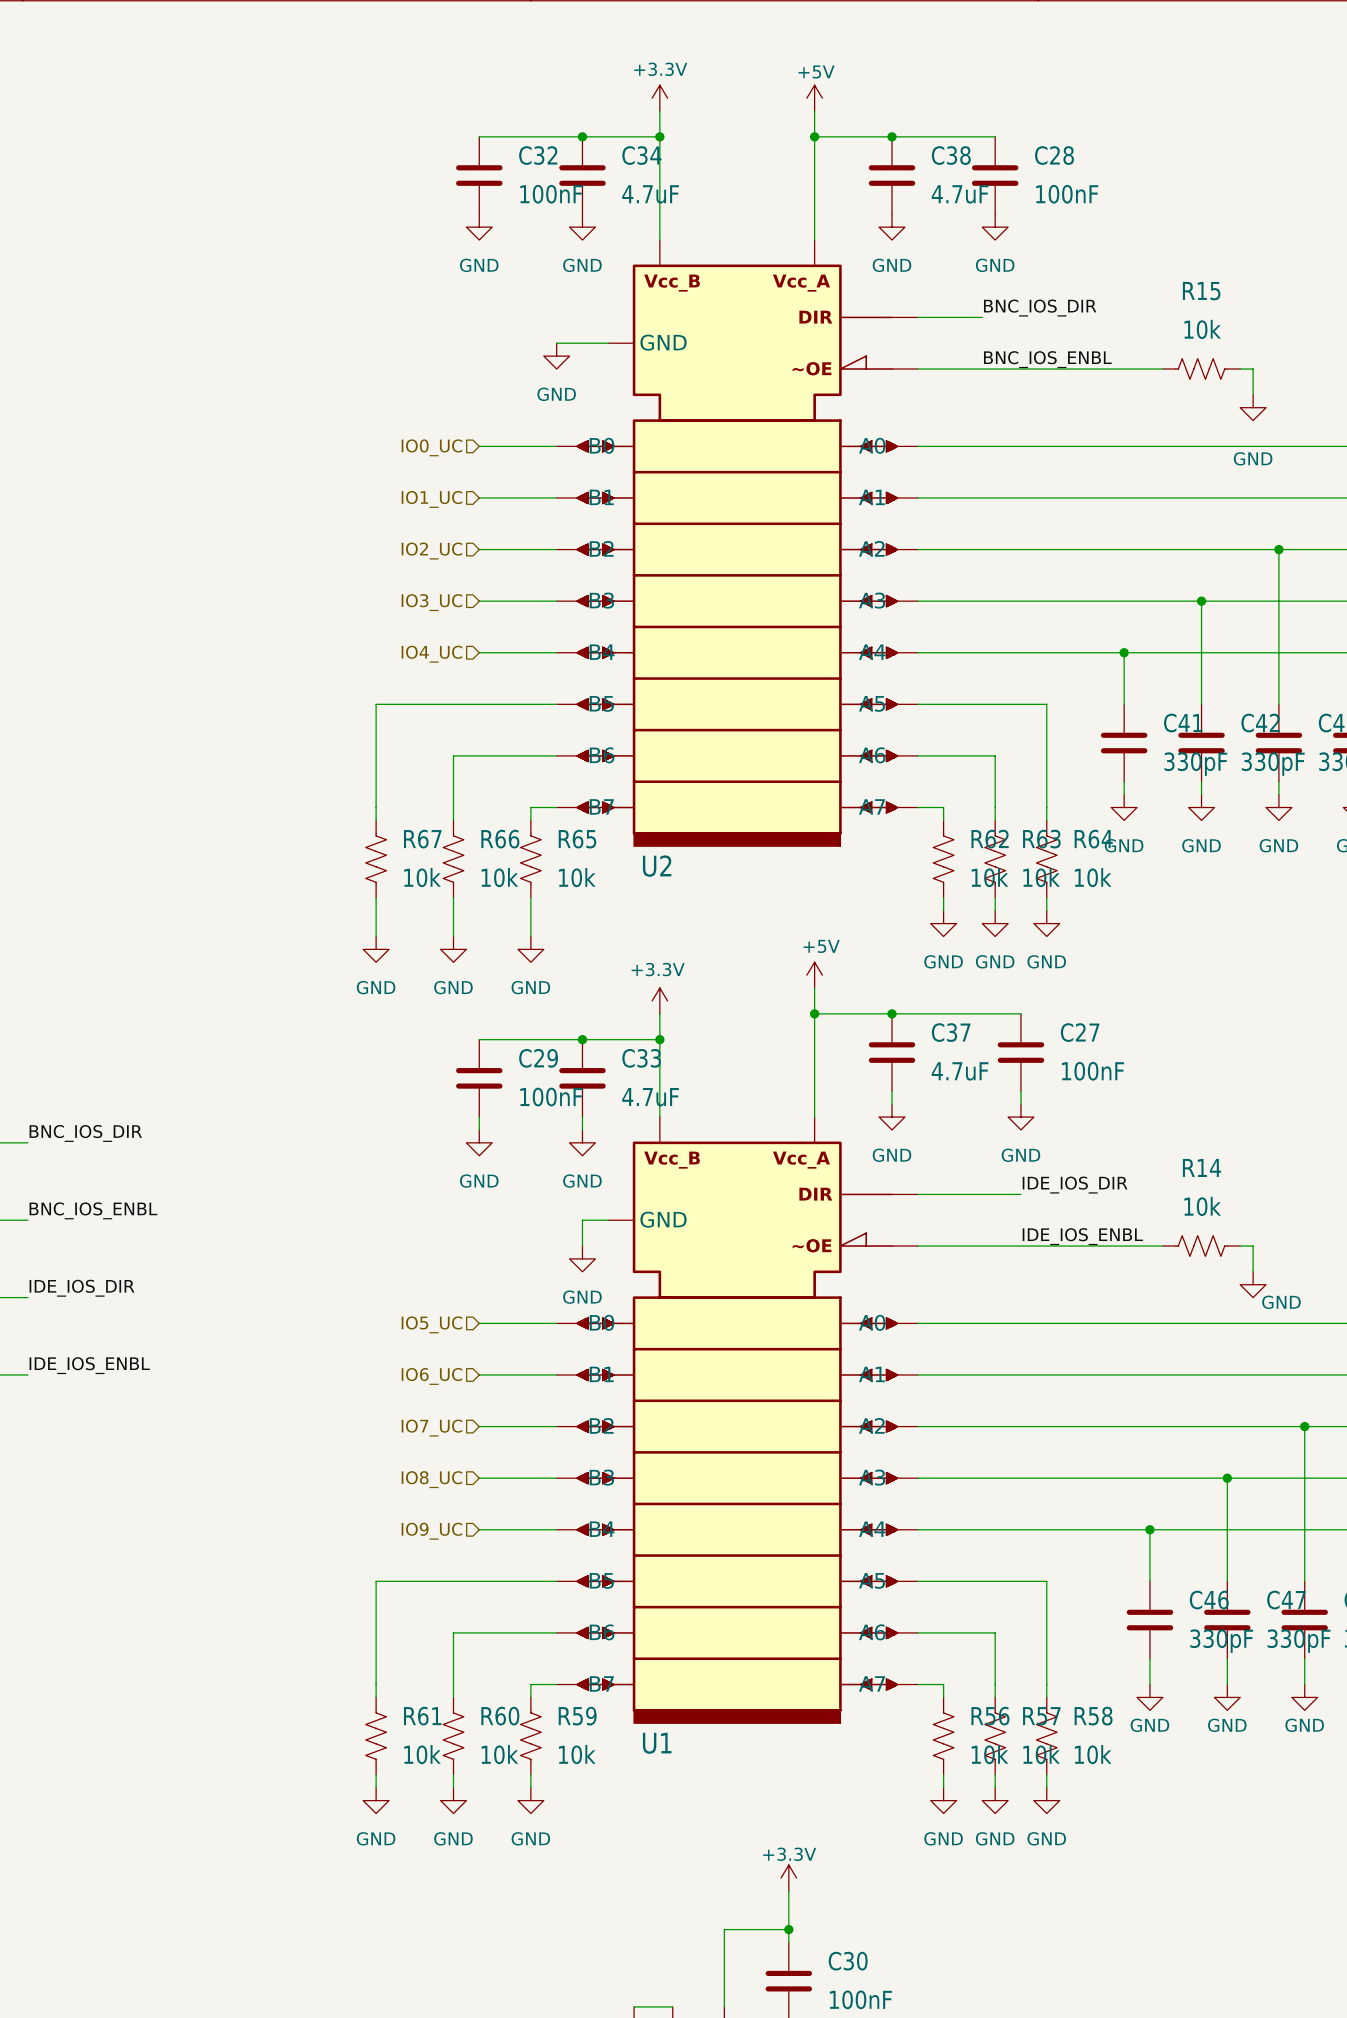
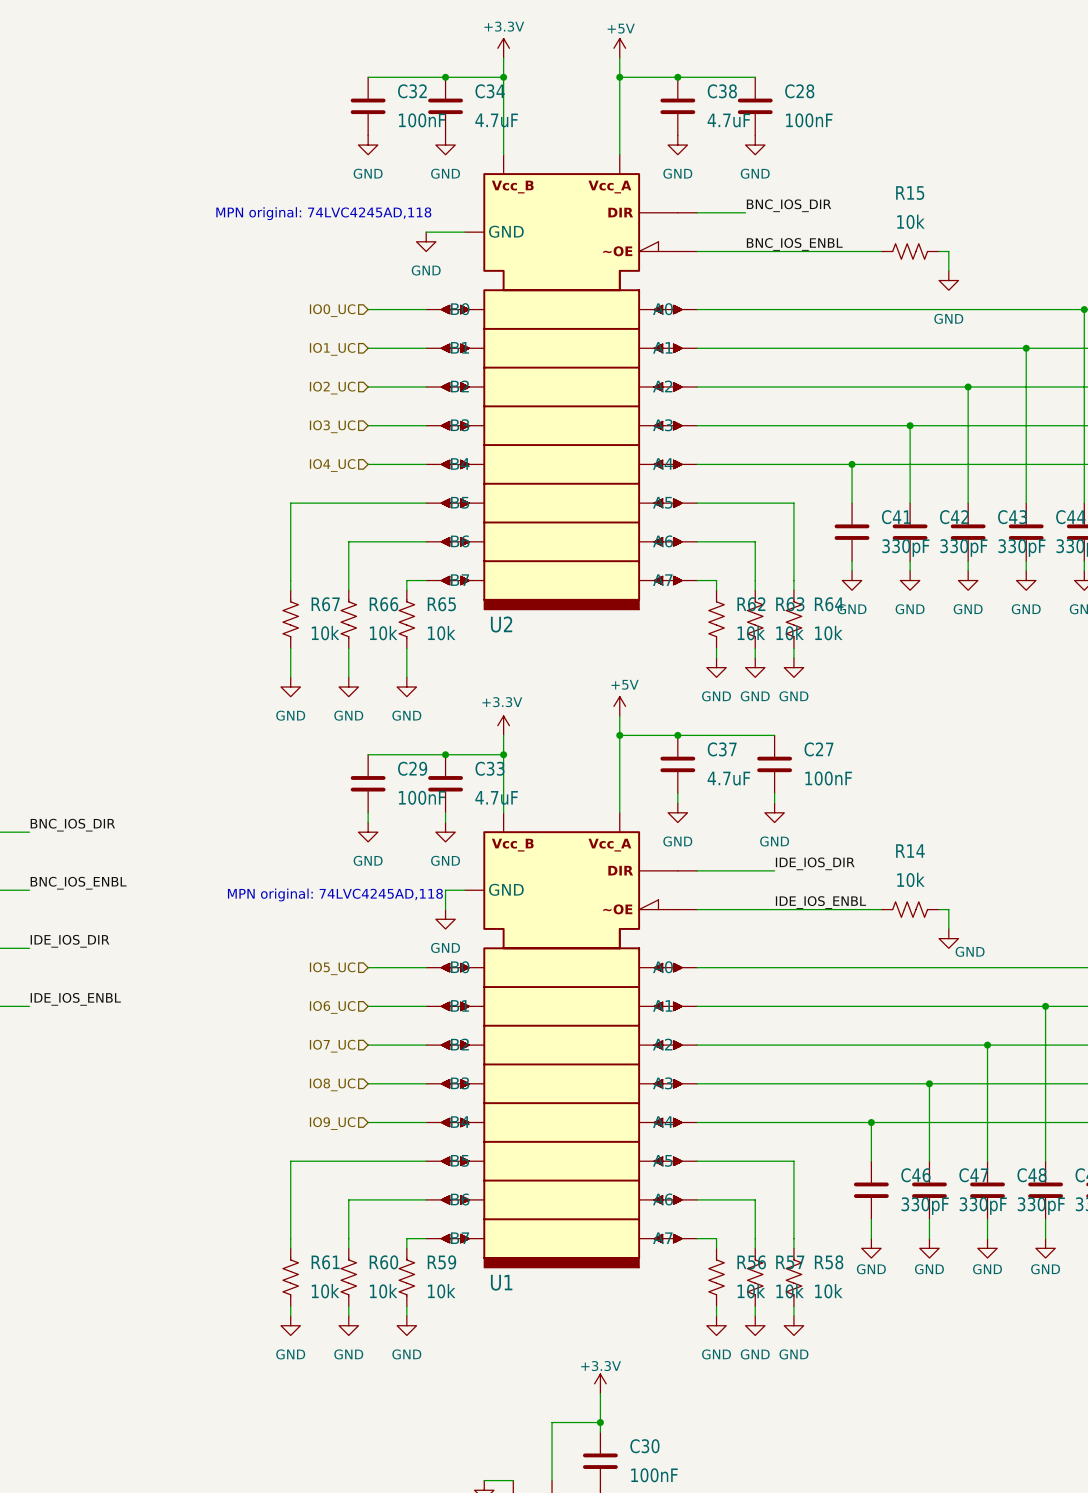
text: none -> MPN original: 74LVC4245AD,118 (323, 213)
text: none -> MPN original: 74LVC4245AD,118 (335, 894)

